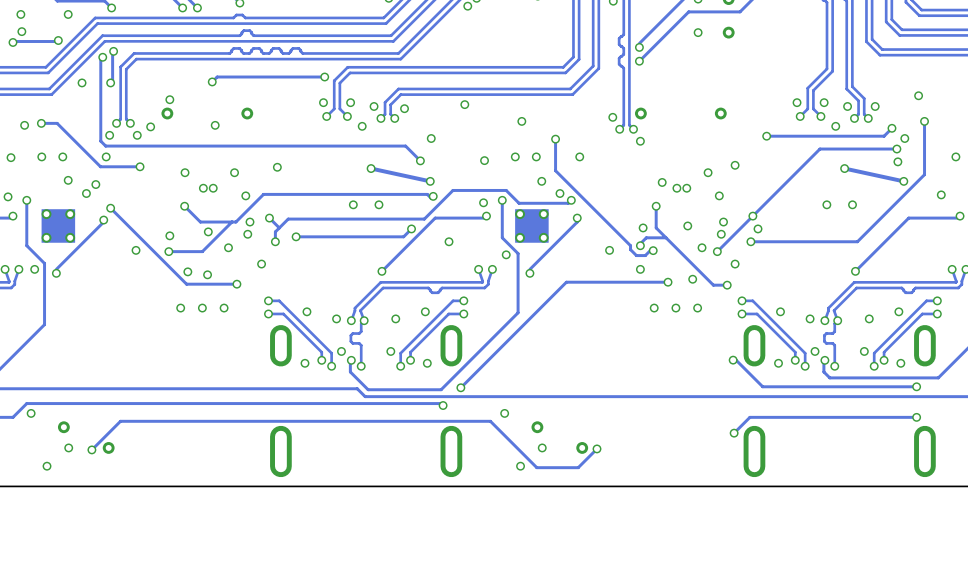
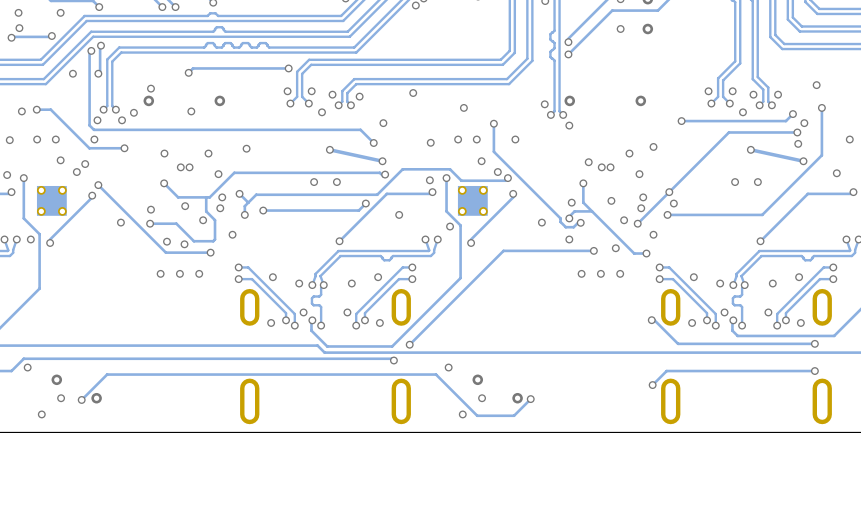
track: (231, 222) (202, 251) (198, 251) -> (206, 197) (206, 211) (215, 220) (215, 239) (213, 241) (193, 241) (176, 223)

